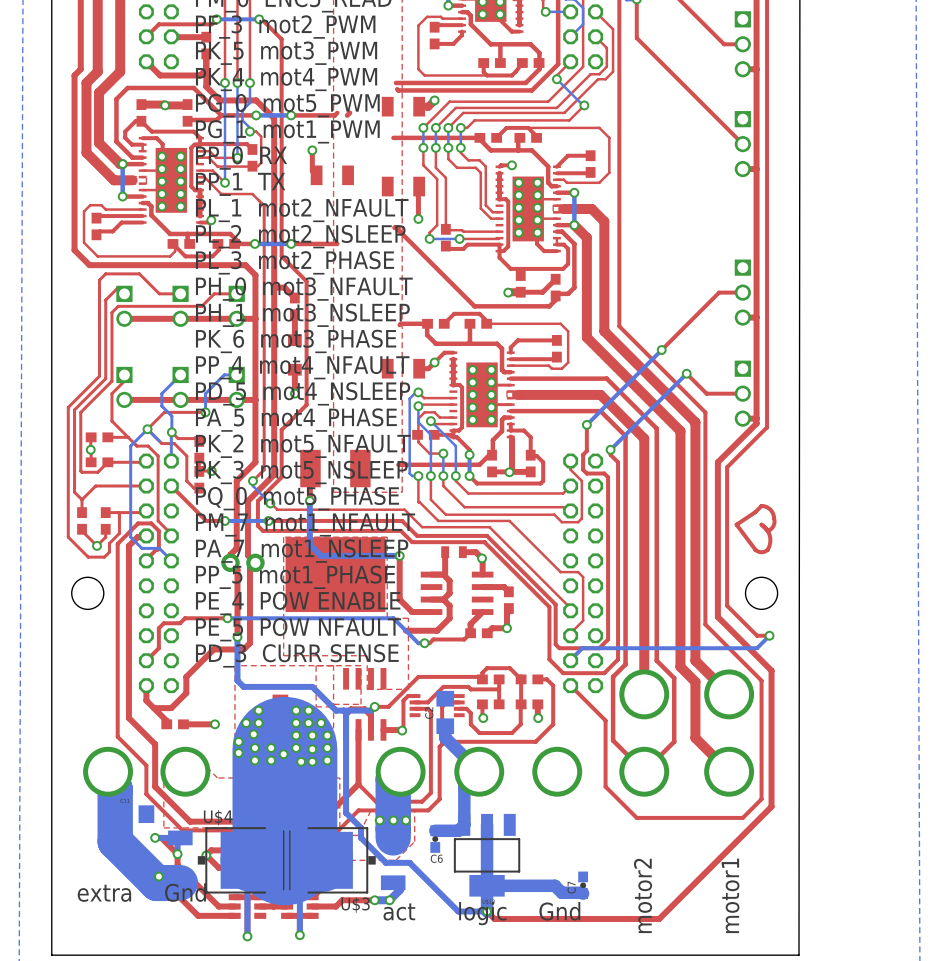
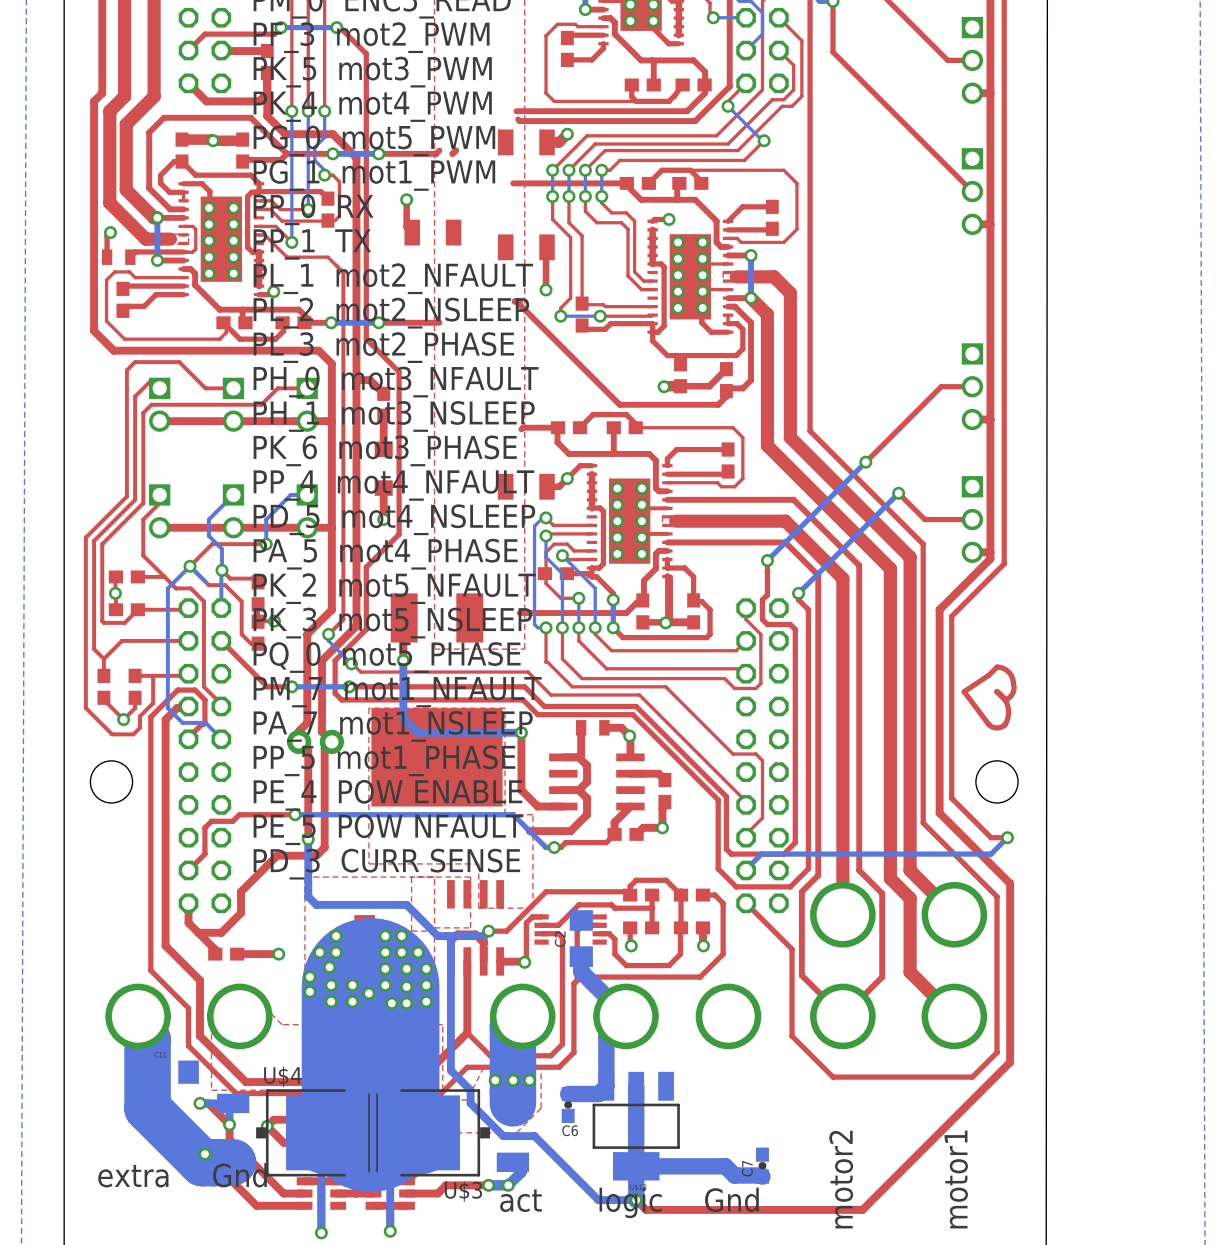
top track: (162, 169) (149, 170) -> (130, 257) (135, 251) (192, 252) (195, 248) (195, 229) (192, 226)
top track: none -> (110, 232) (107, 235) (107, 257)
via: none -> (110, 232)
top track: (142, 190) (158, 190) (162, 194) -> none
part: none -> (118, 257)

